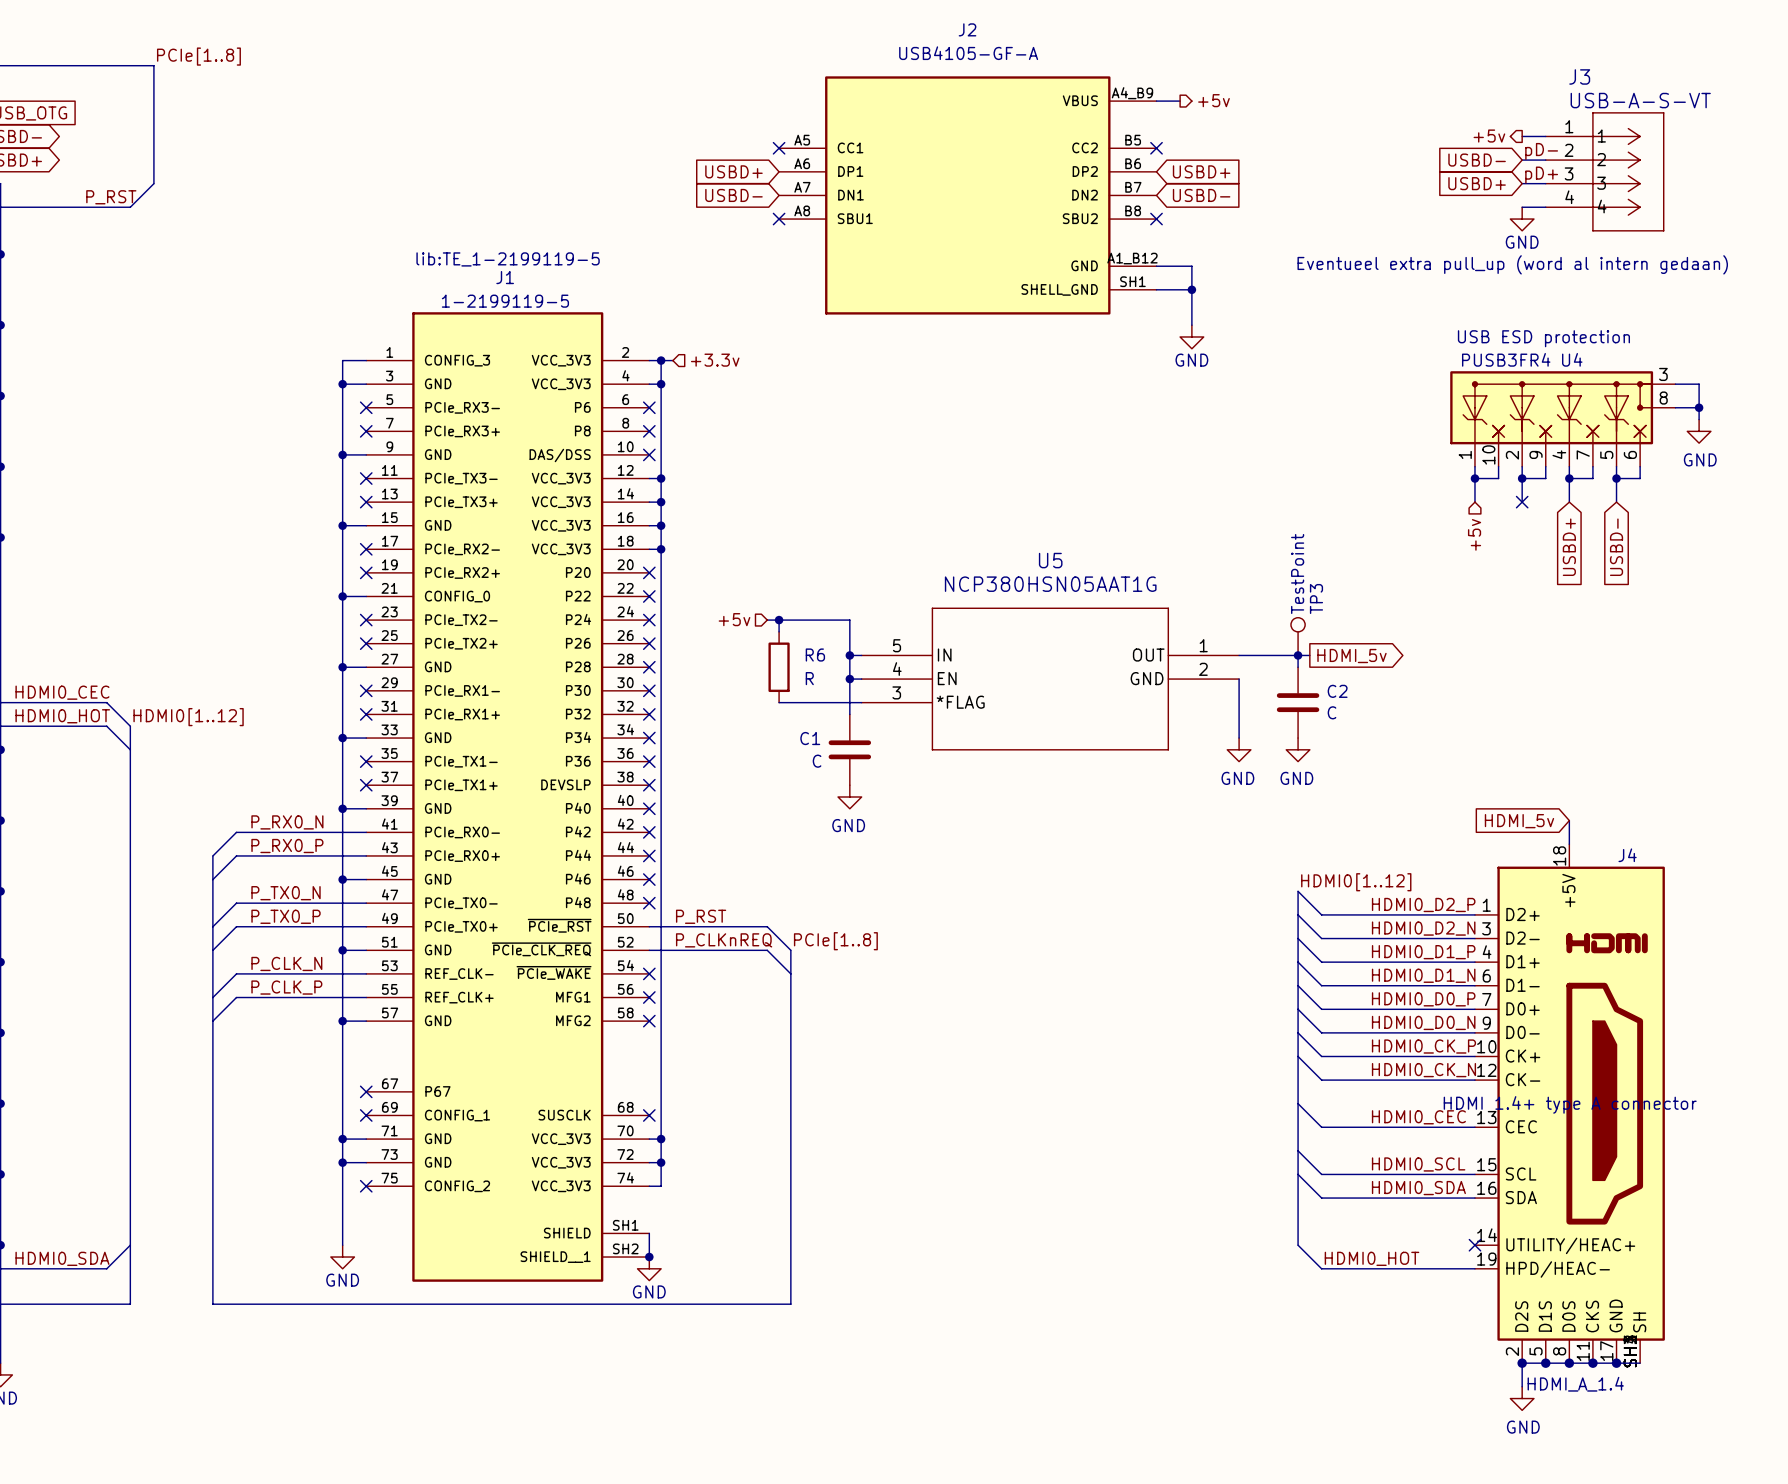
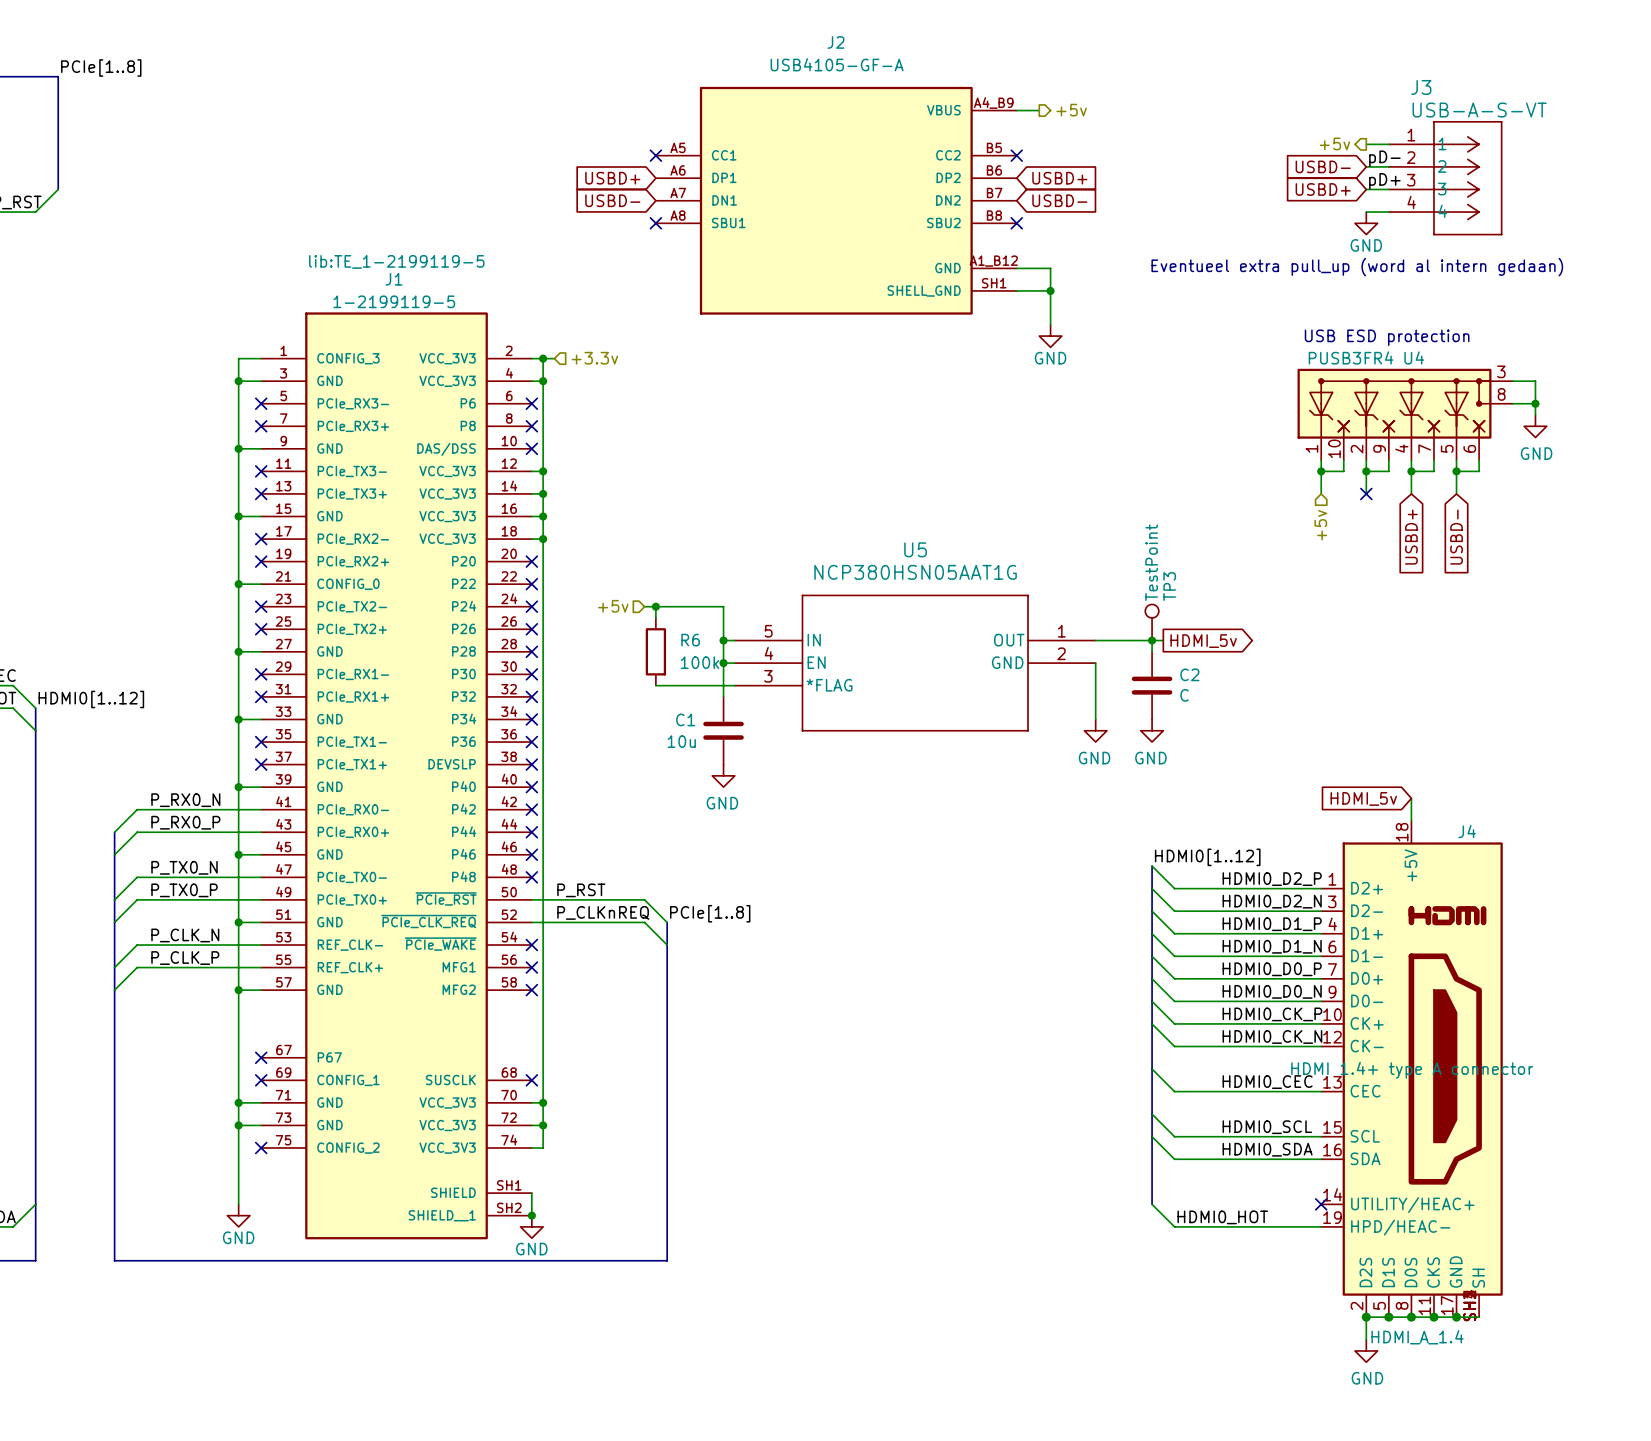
R6 value: R (809, 678) -> 100k (700, 662)
C1 value: C (817, 761) -> 10u (681, 741)

